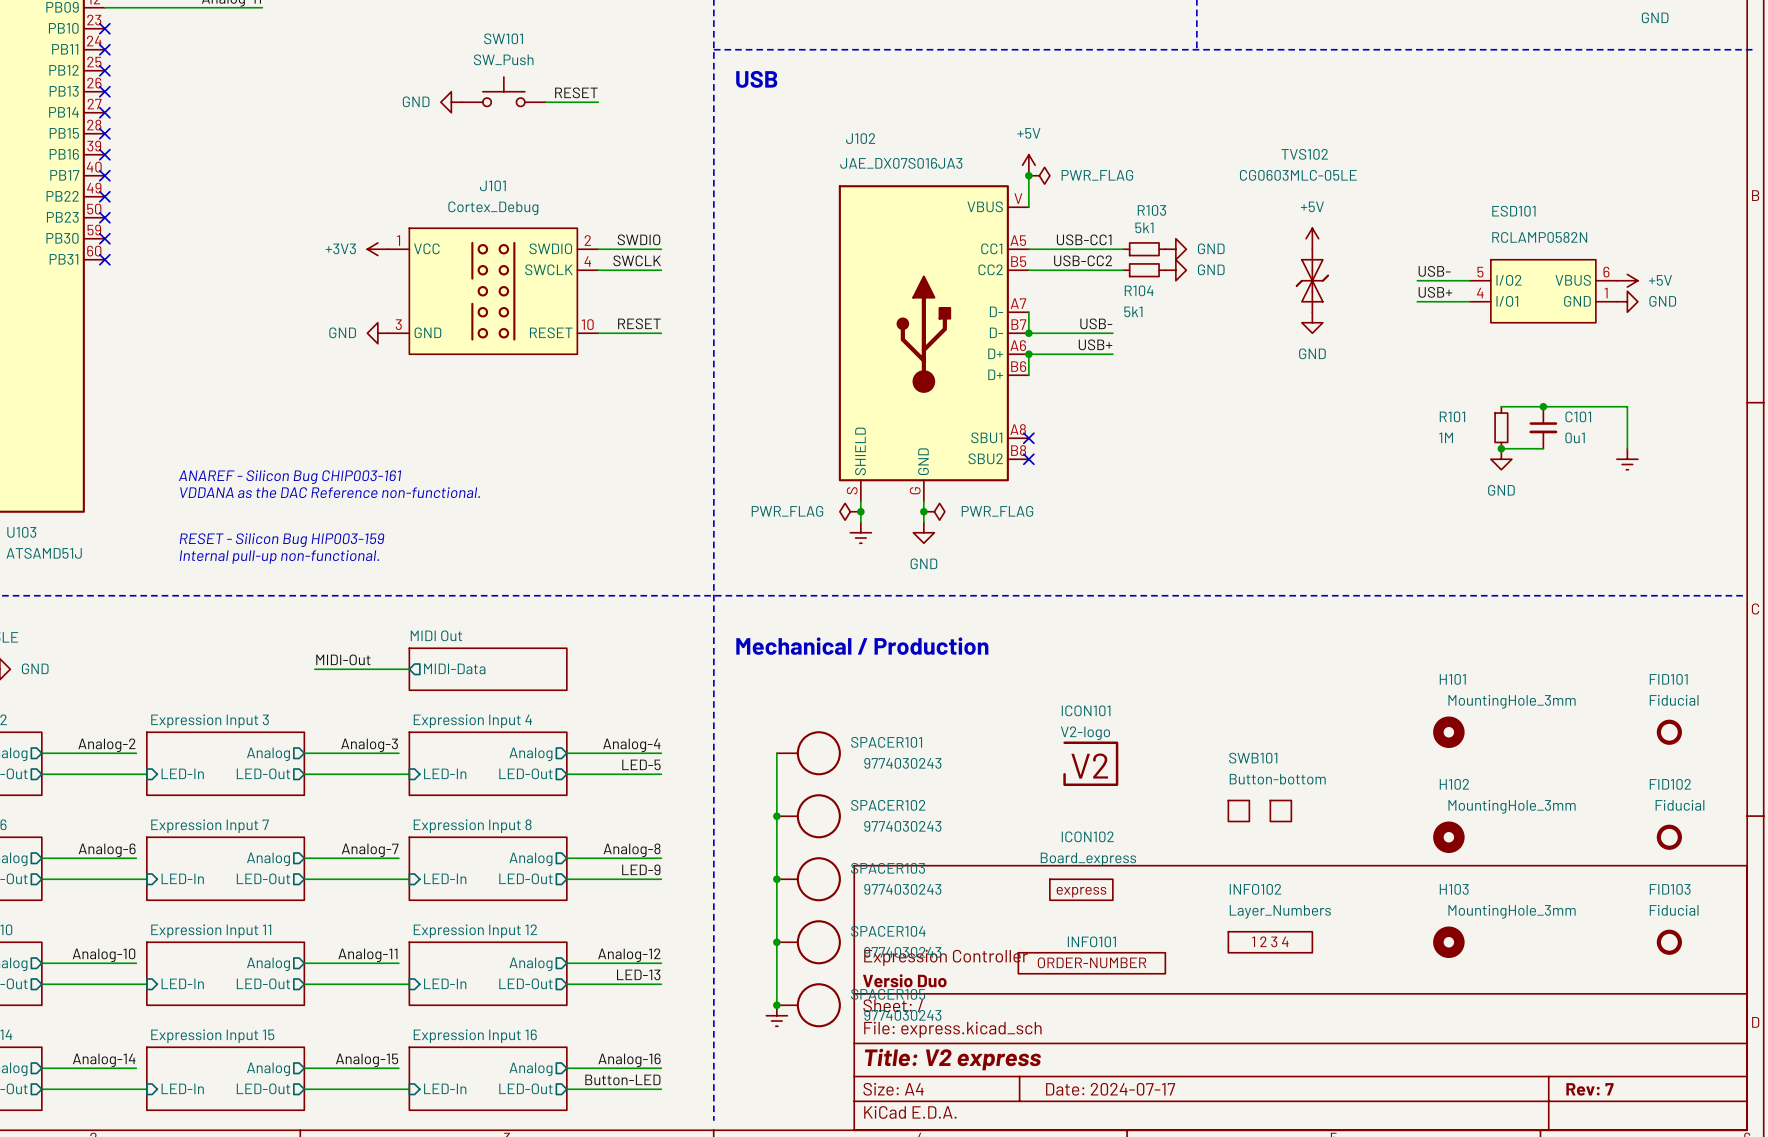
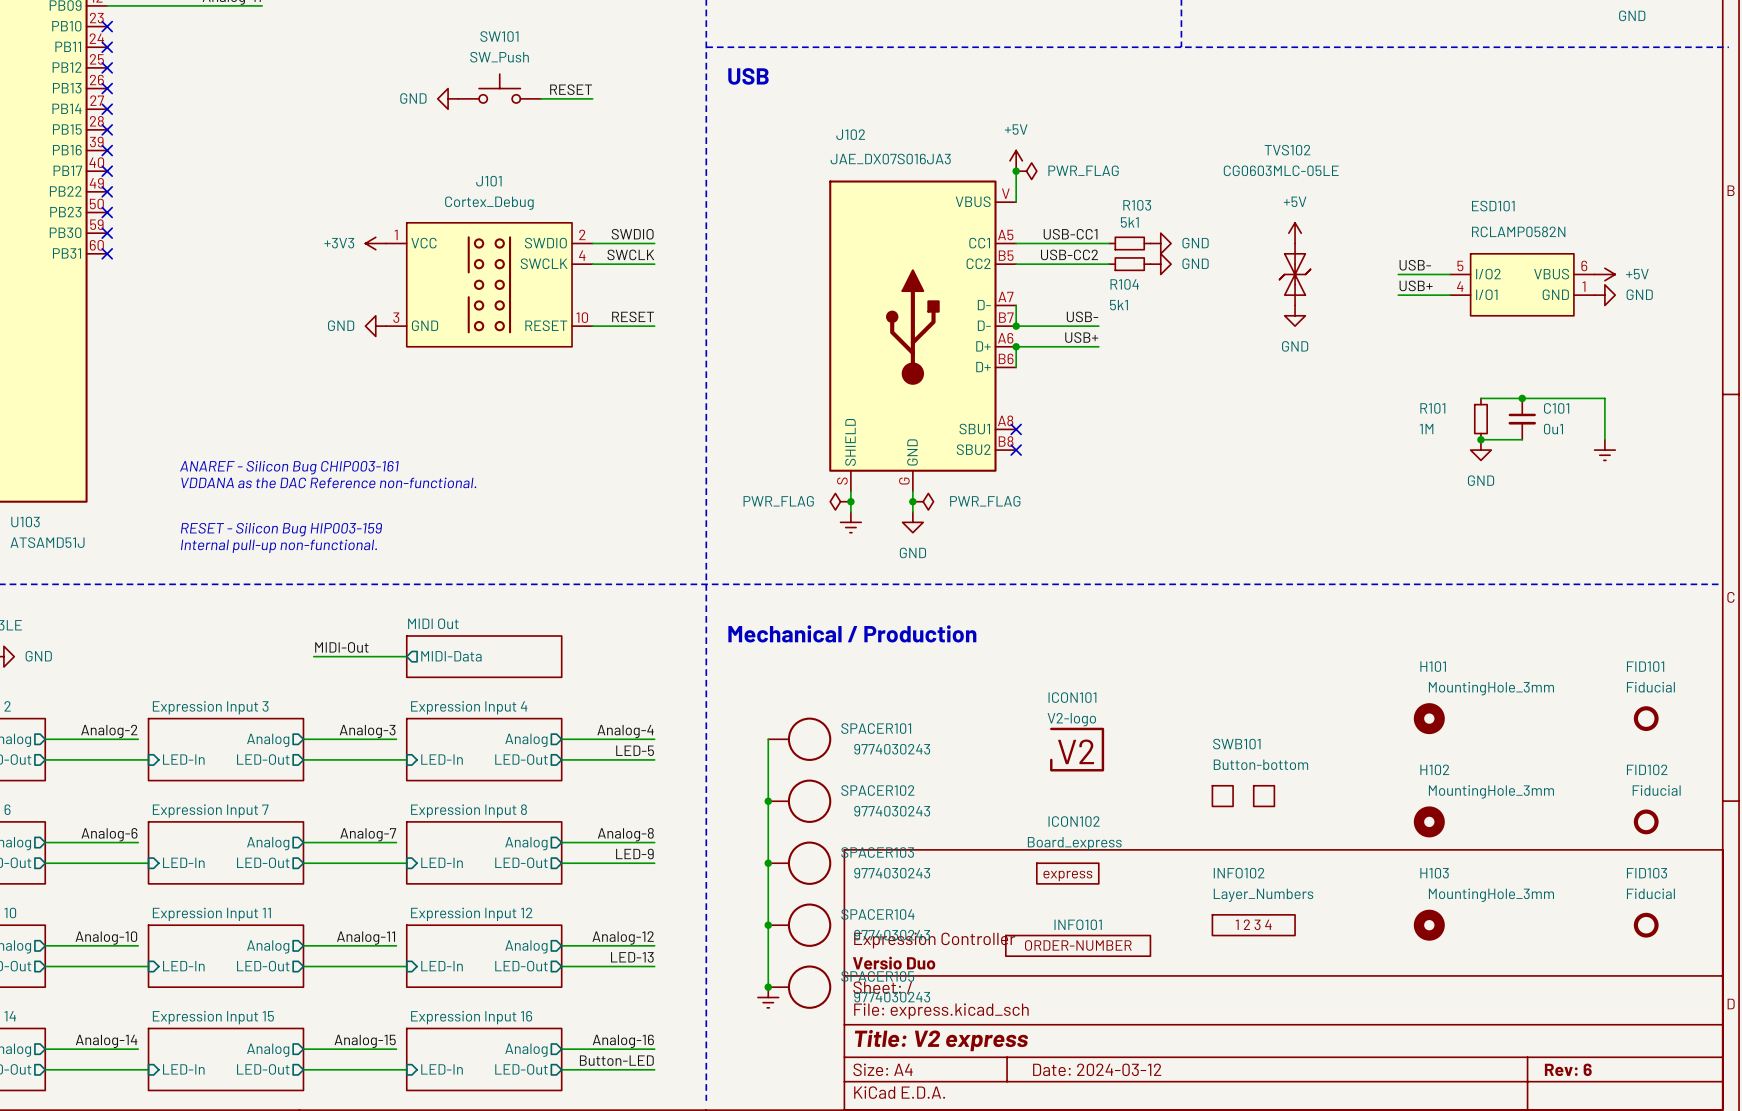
title block: Date: 2024-07-17 (1110, 1089) -> Date: 2024-03-12 (1097, 1069)
title block: Rev: 7 (1589, 1089) -> Rev: 6 (1568, 1069)

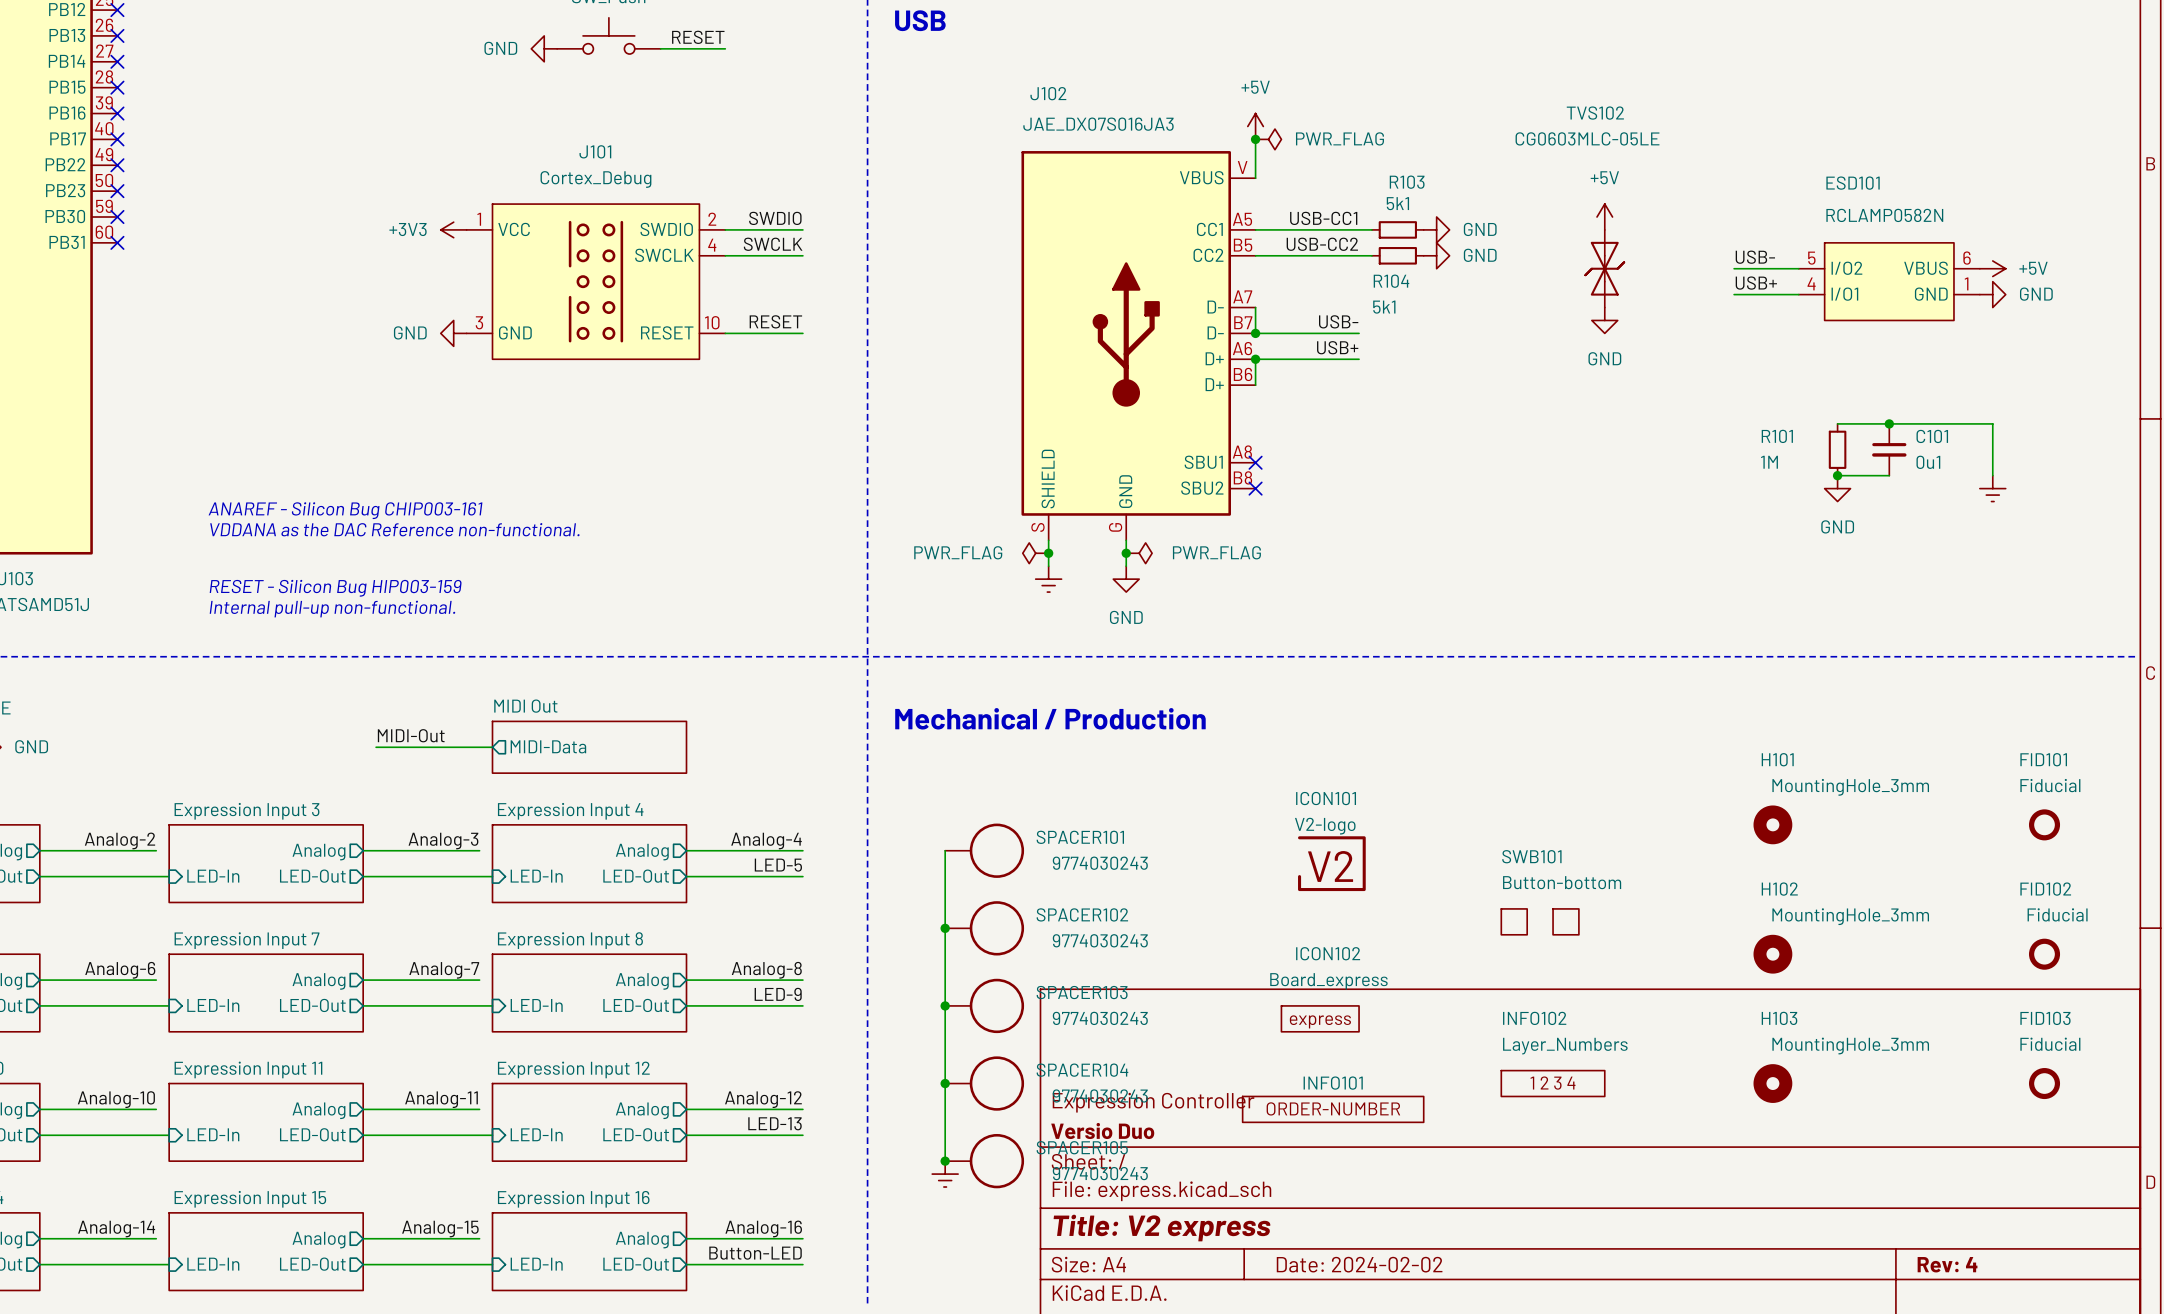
title block: Date: 2024-03-12 (1097, 1069) -> Date: 2024-02-02 (1359, 1264)
title block: Rev: 6 (1568, 1069) -> Rev: 4 (1947, 1264)

